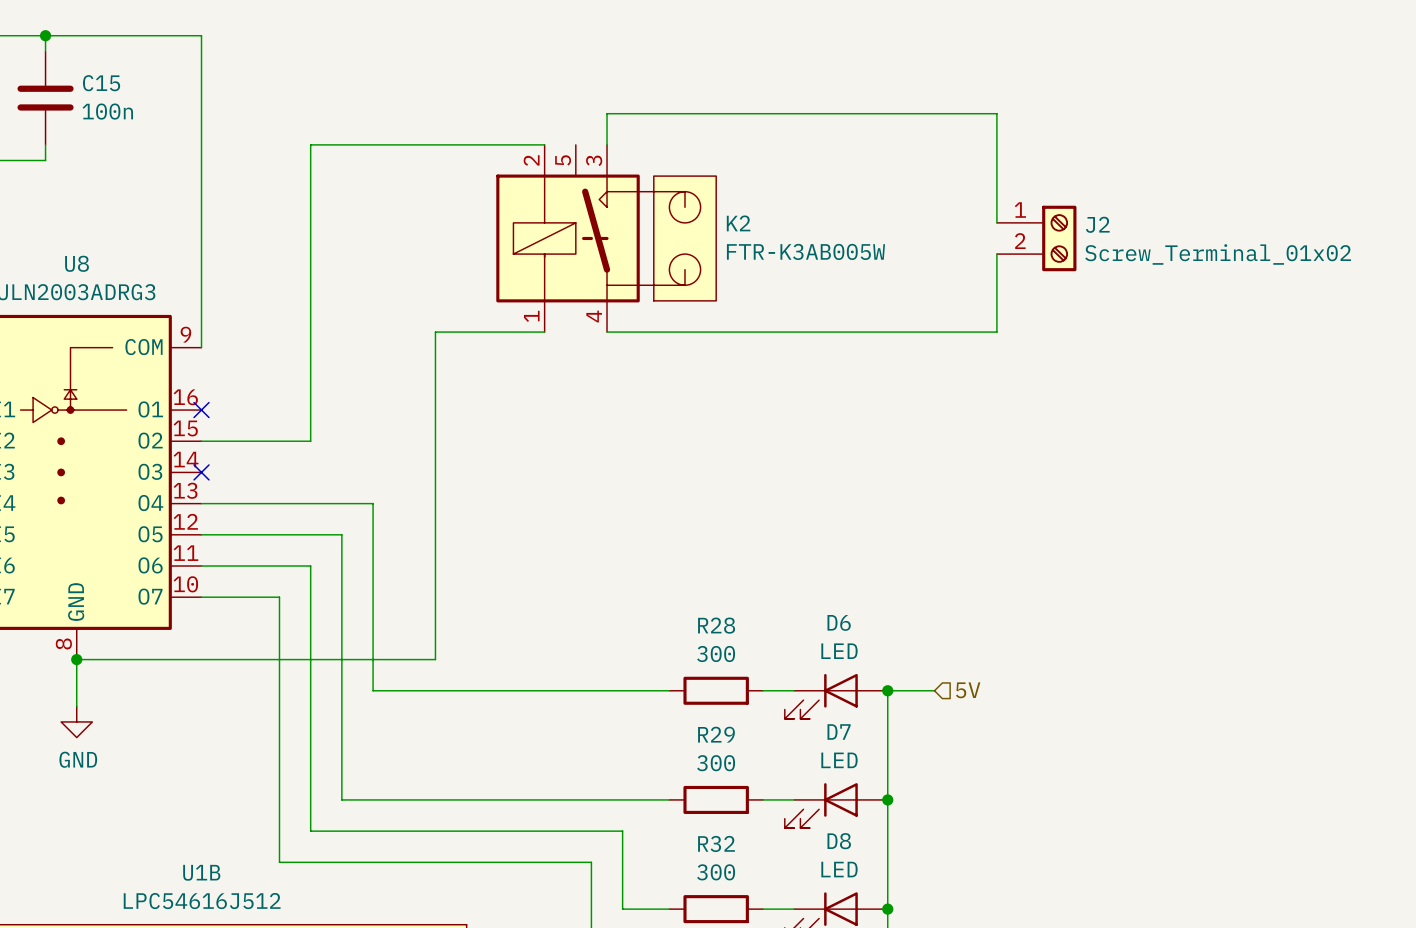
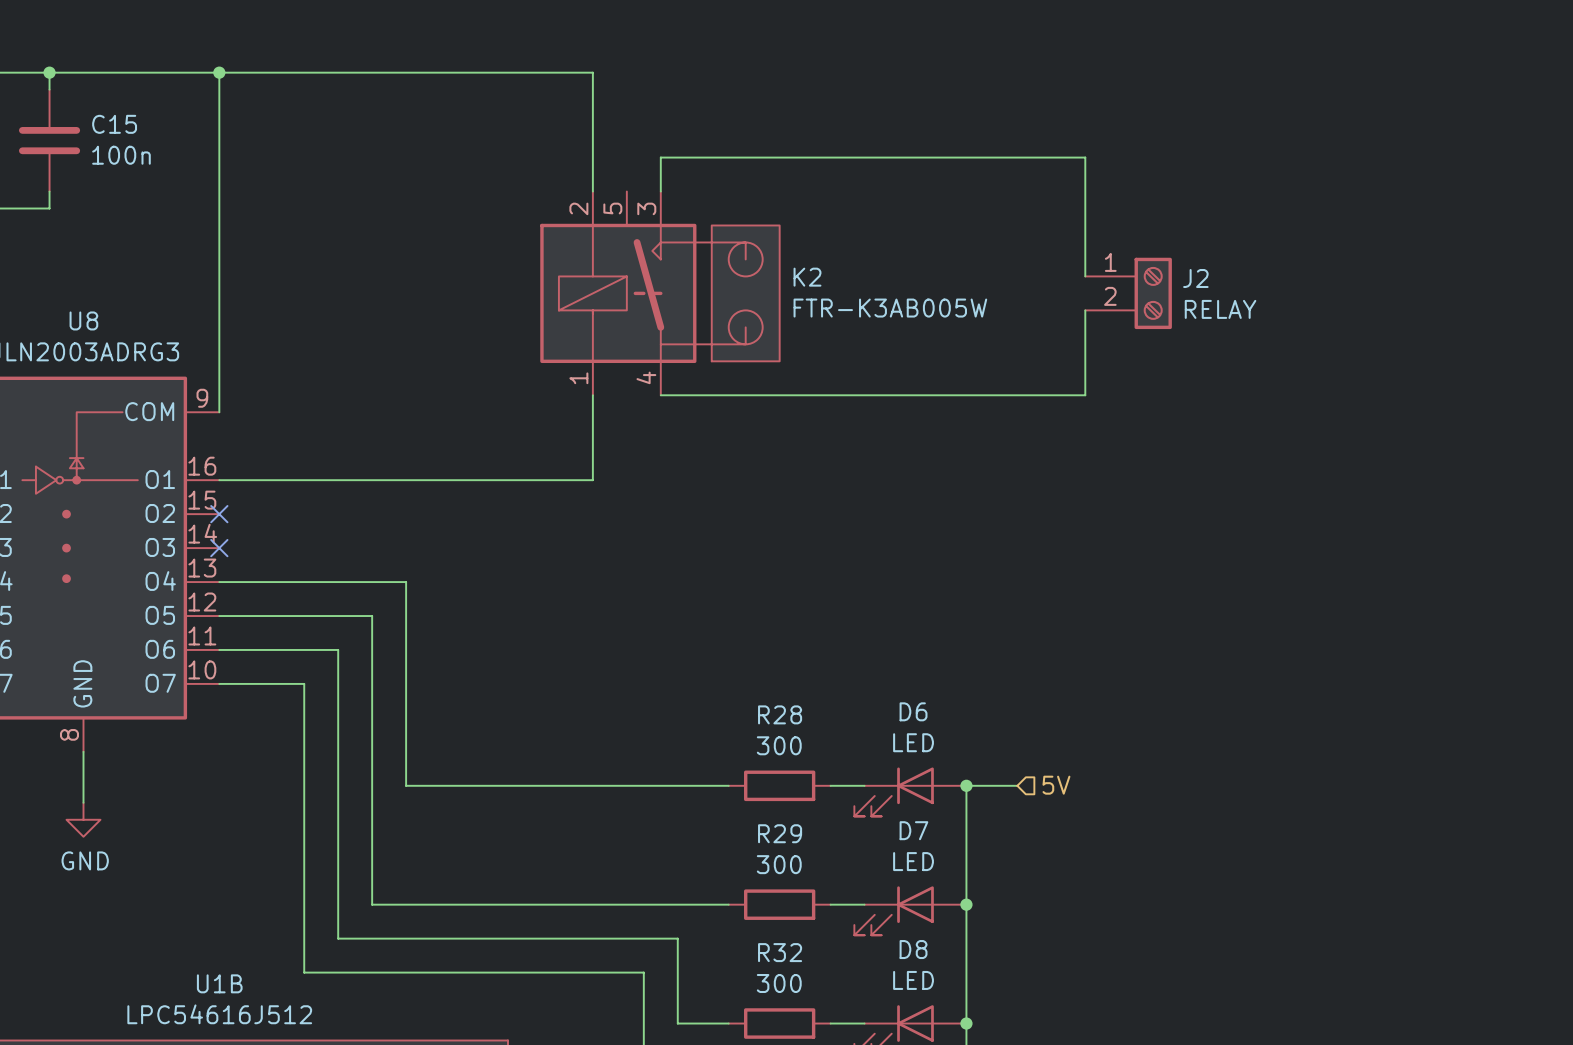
junction: none -> (219, 72)
wire: (544, 144) (310, 144) (310, 441) (201, 441) -> (592, 191) (592, 72) (219, 72)
J2 value: Screw_Terminal_01x02 (1218, 254) -> RELAY (1220, 309)
wire: (544, 332) (435, 332) (435, 659) (76, 659) -> (592, 395) (592, 480) (219, 480)
no-connect mark position: (201, 410) -> (219, 514)
junction: (76, 659) -> none

